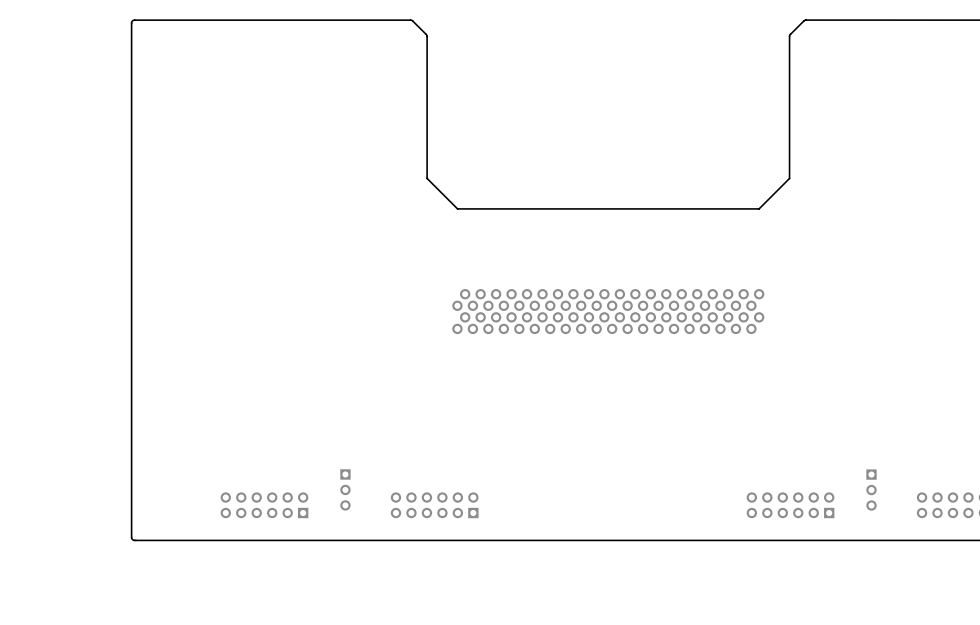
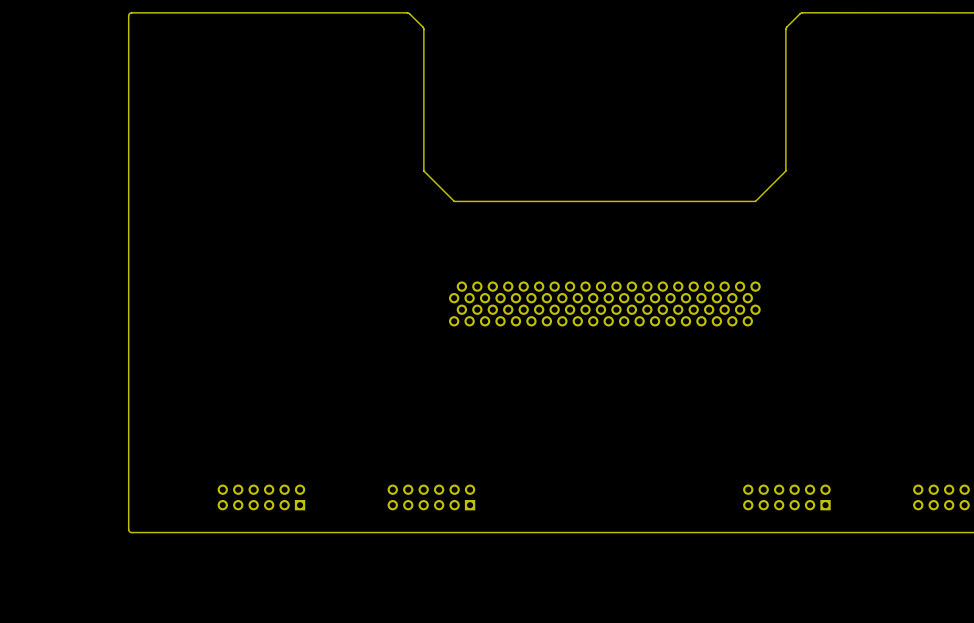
part: (345, 489) -> none
part: (871, 490) -> none

